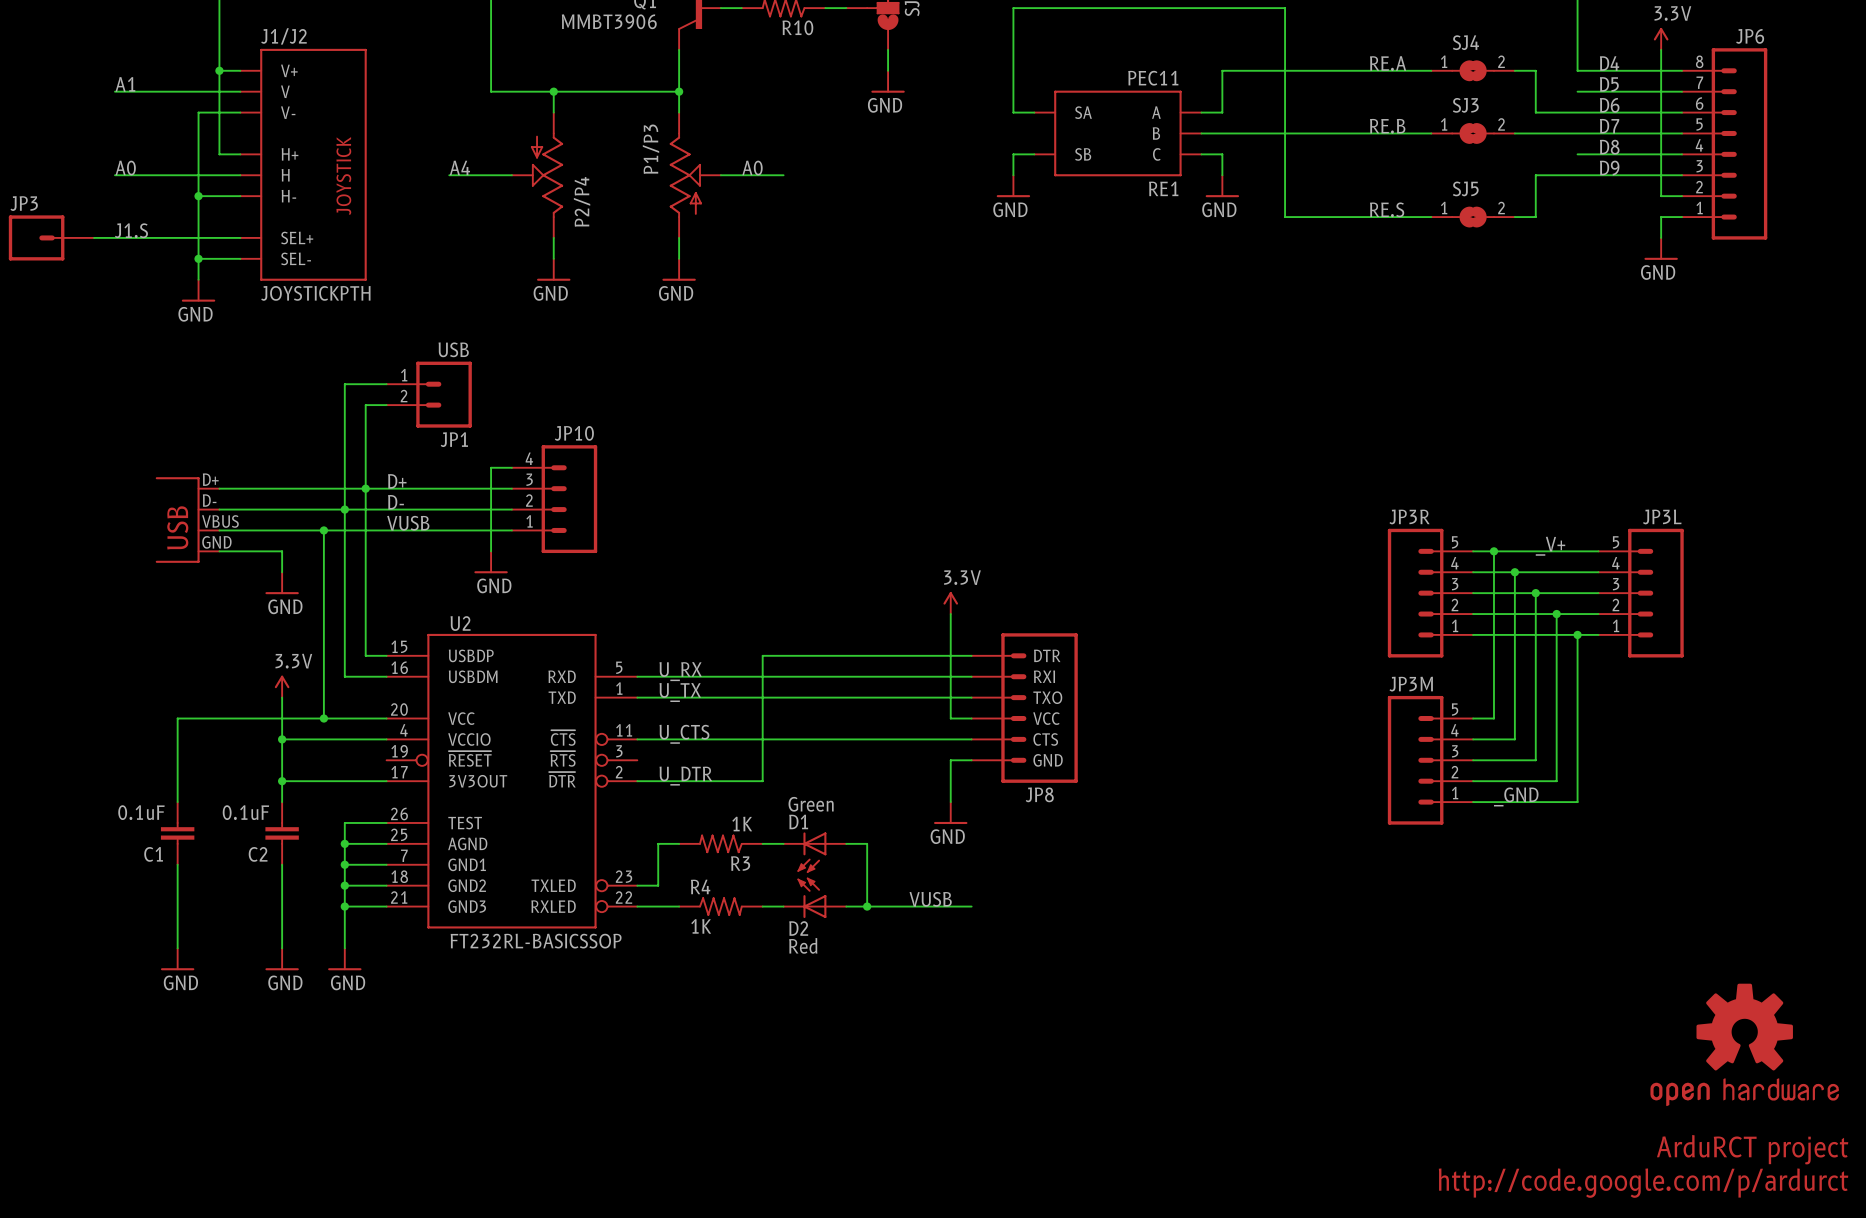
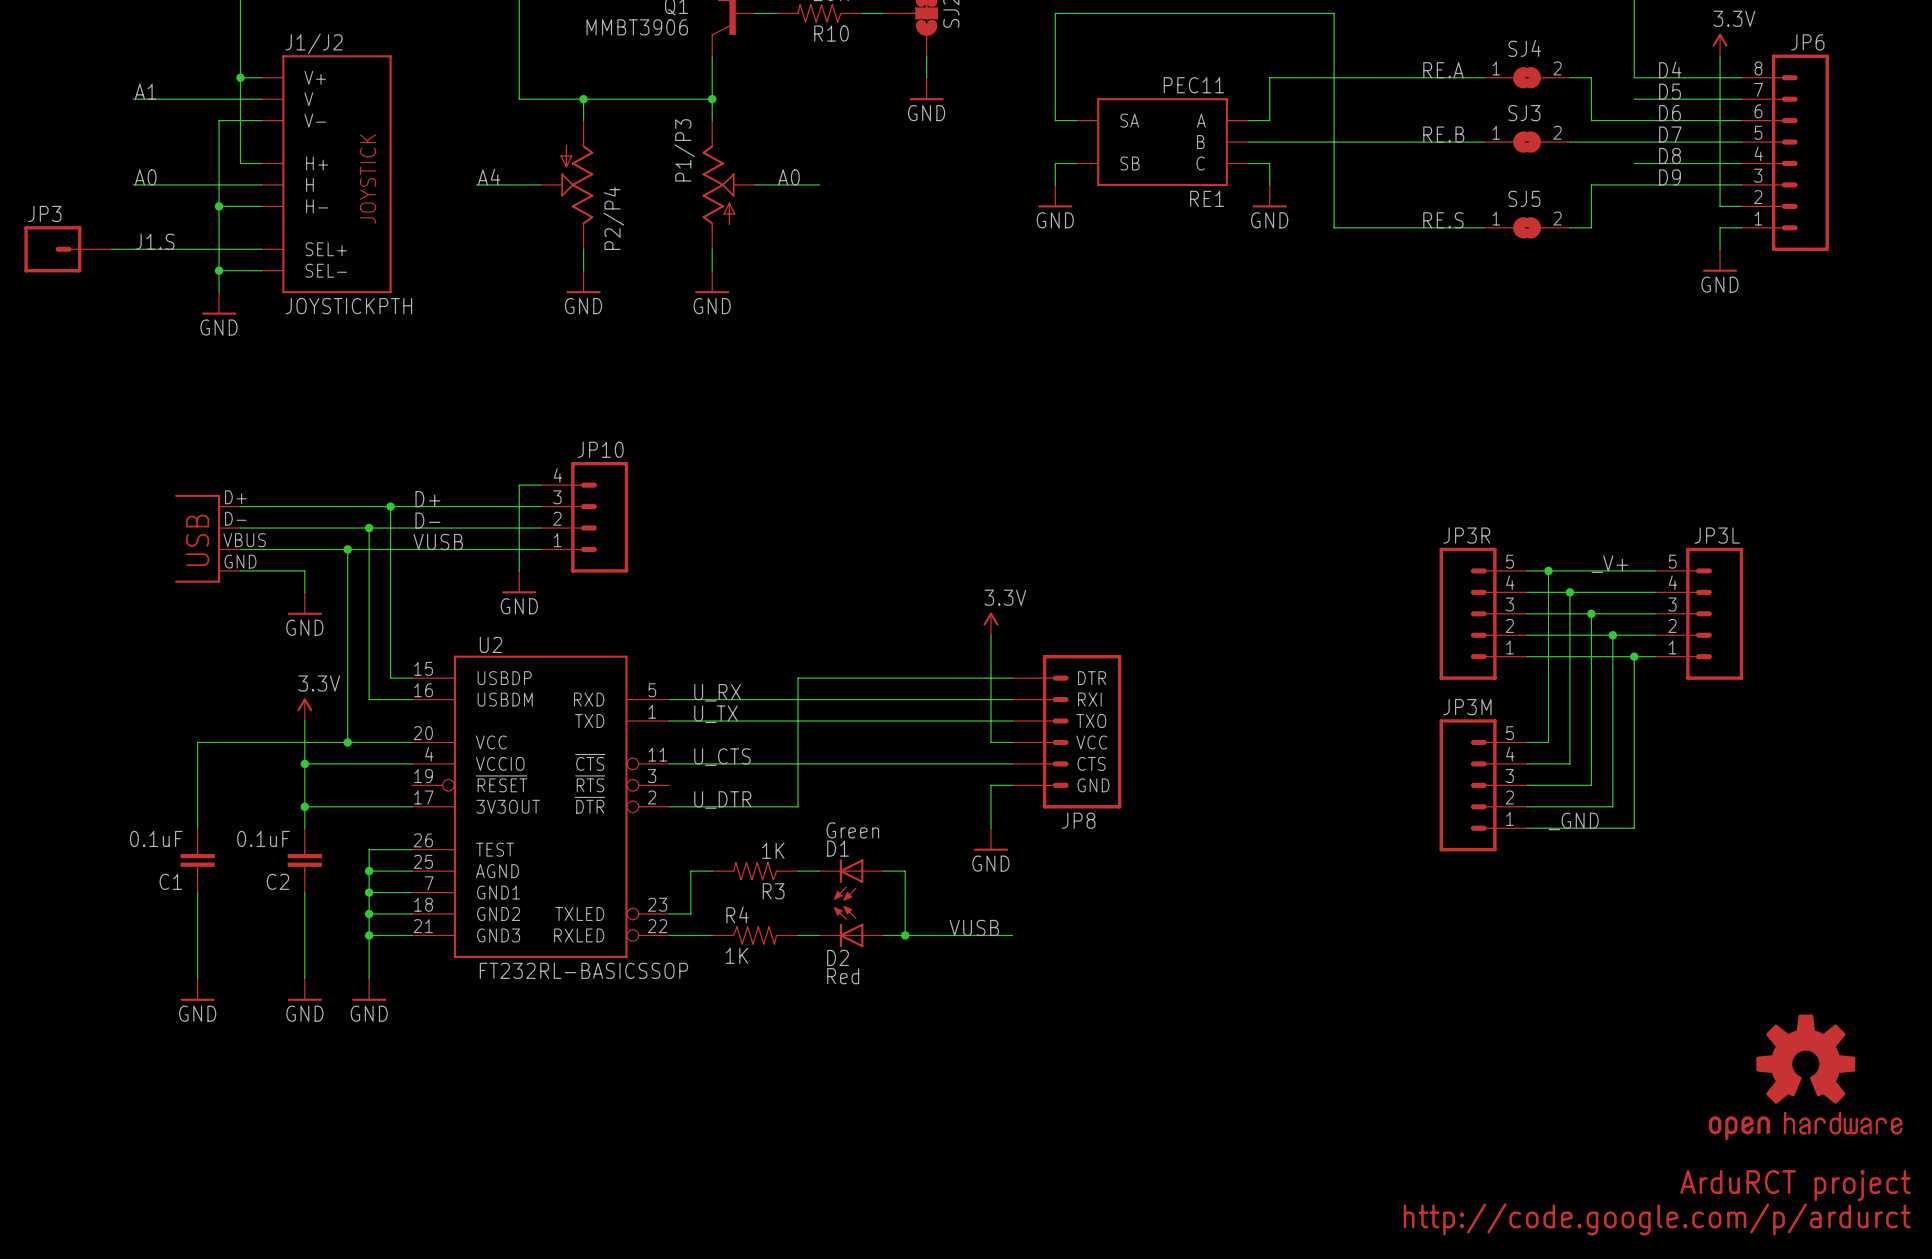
wire: (386, 384) (344, 384) (344, 509) -> none
JP1: USB (429, 394) -> none
wire: (386, 405) (365, 405) (365, 488) -> none

